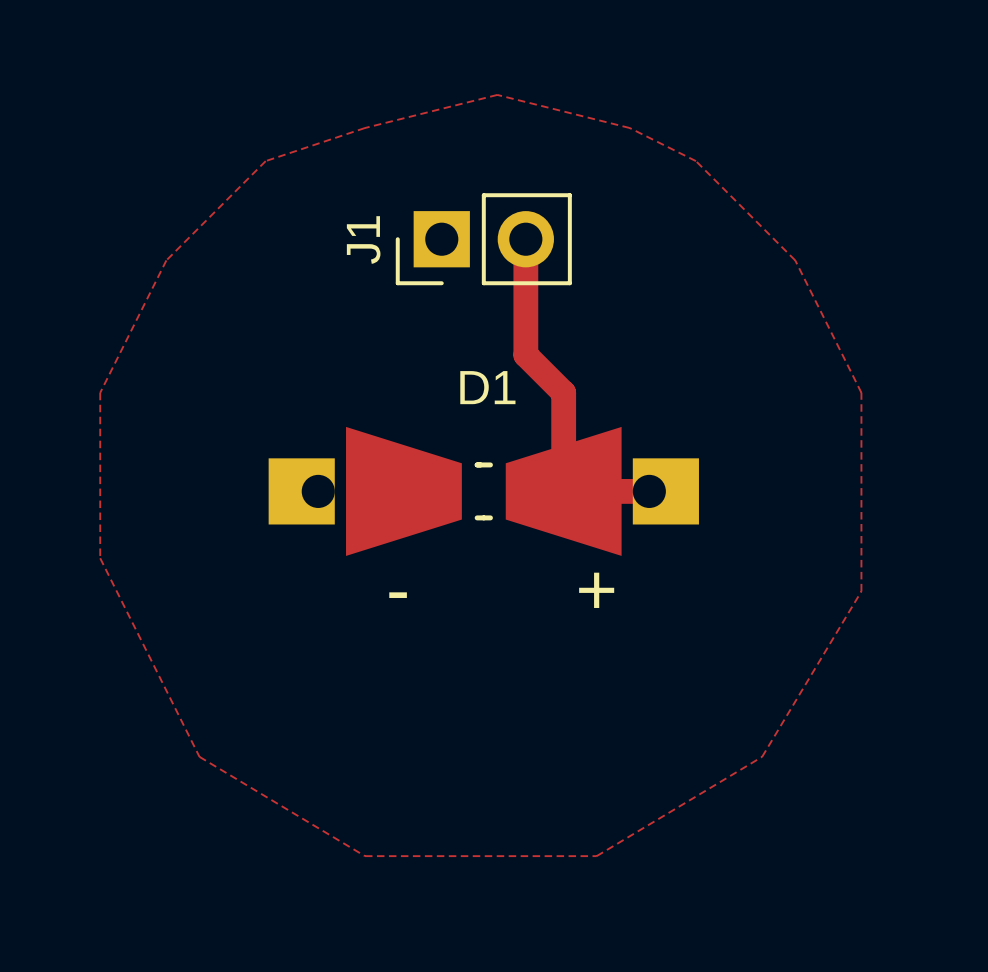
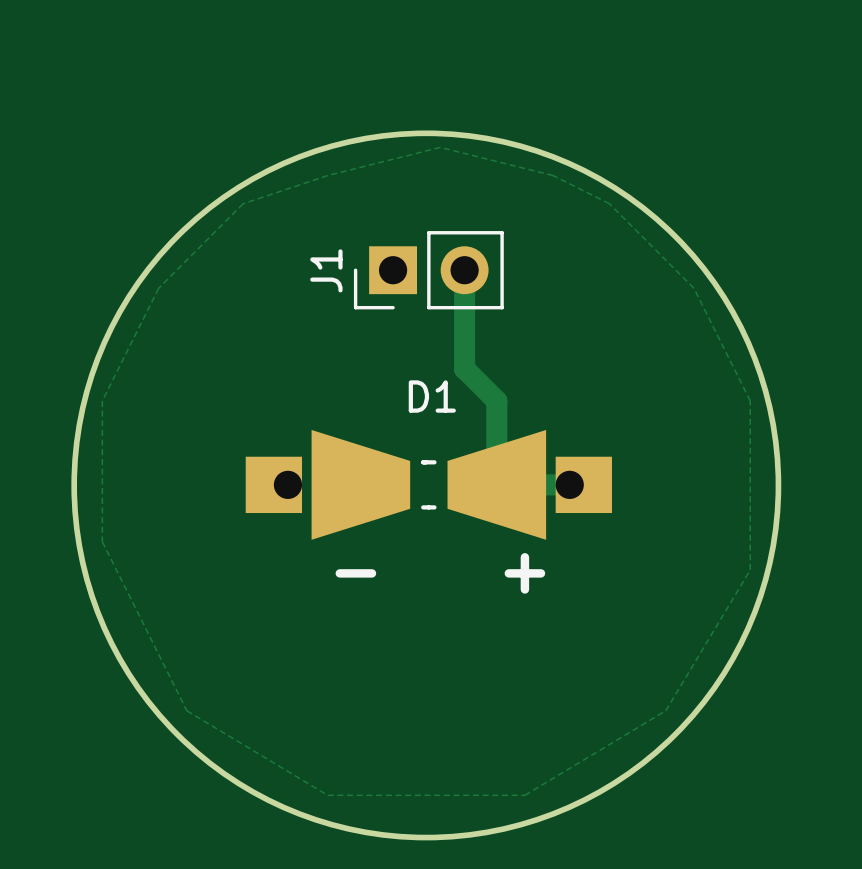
round board edge: none -> [71, 130, 782, 841]

